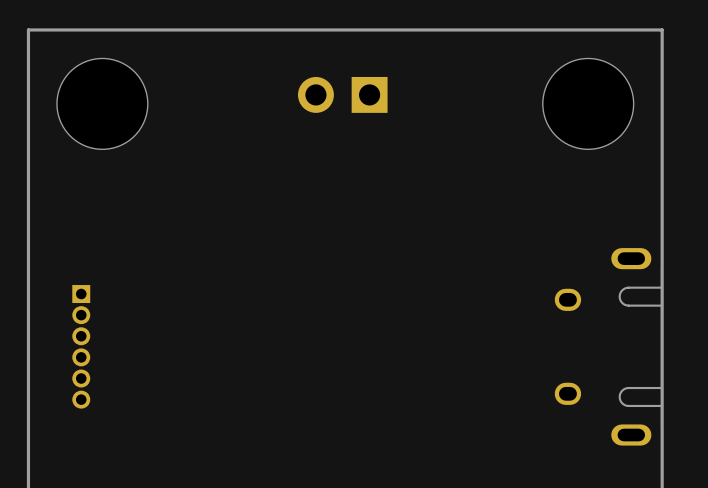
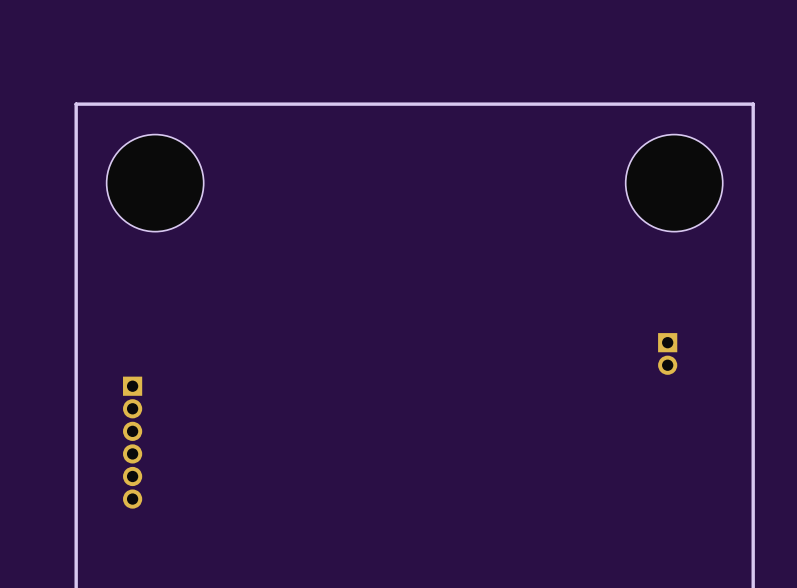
part: (342, 94) -> none
part: none -> (667, 353)
part: (608, 346) -> none

